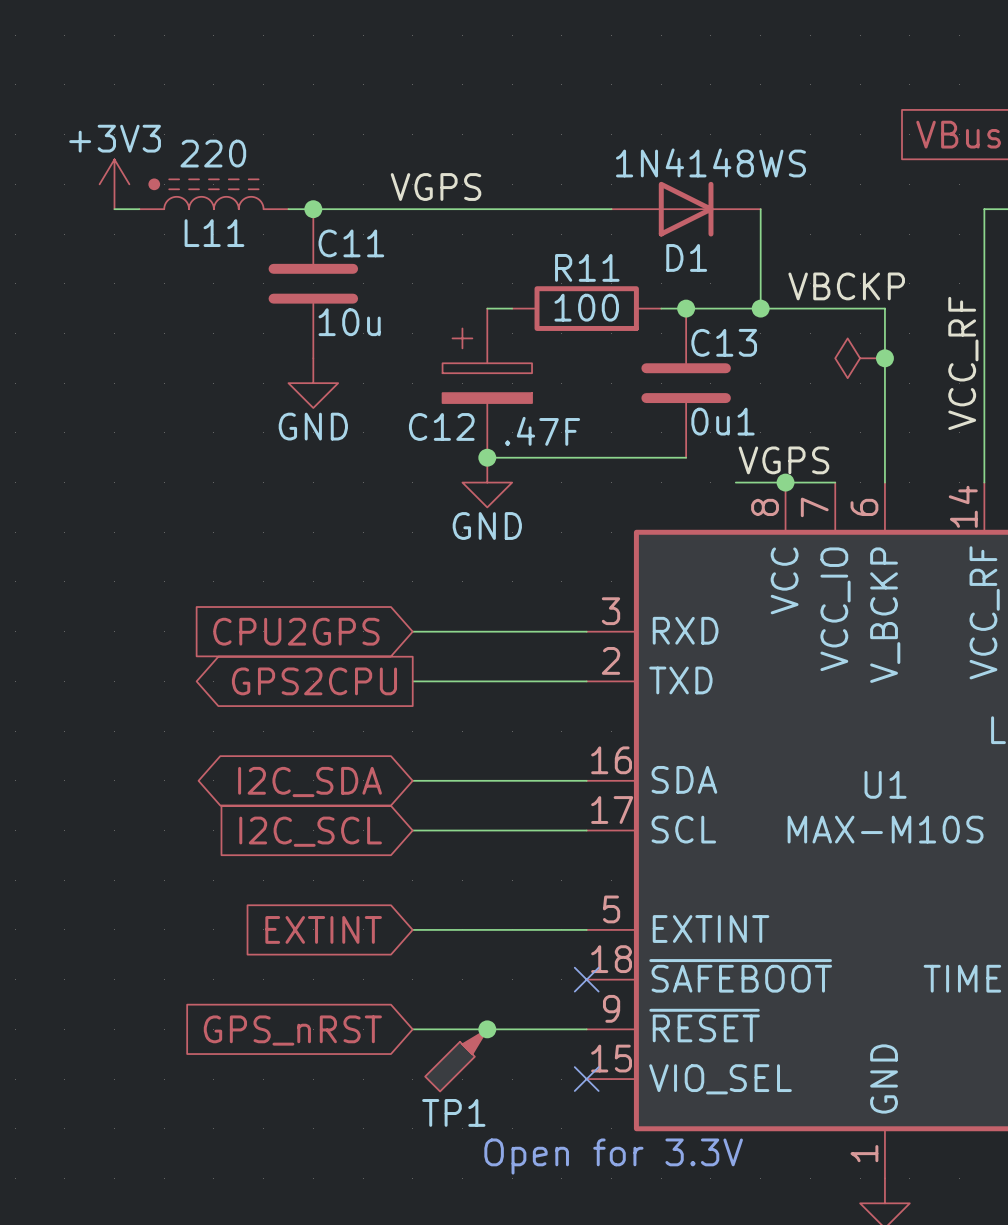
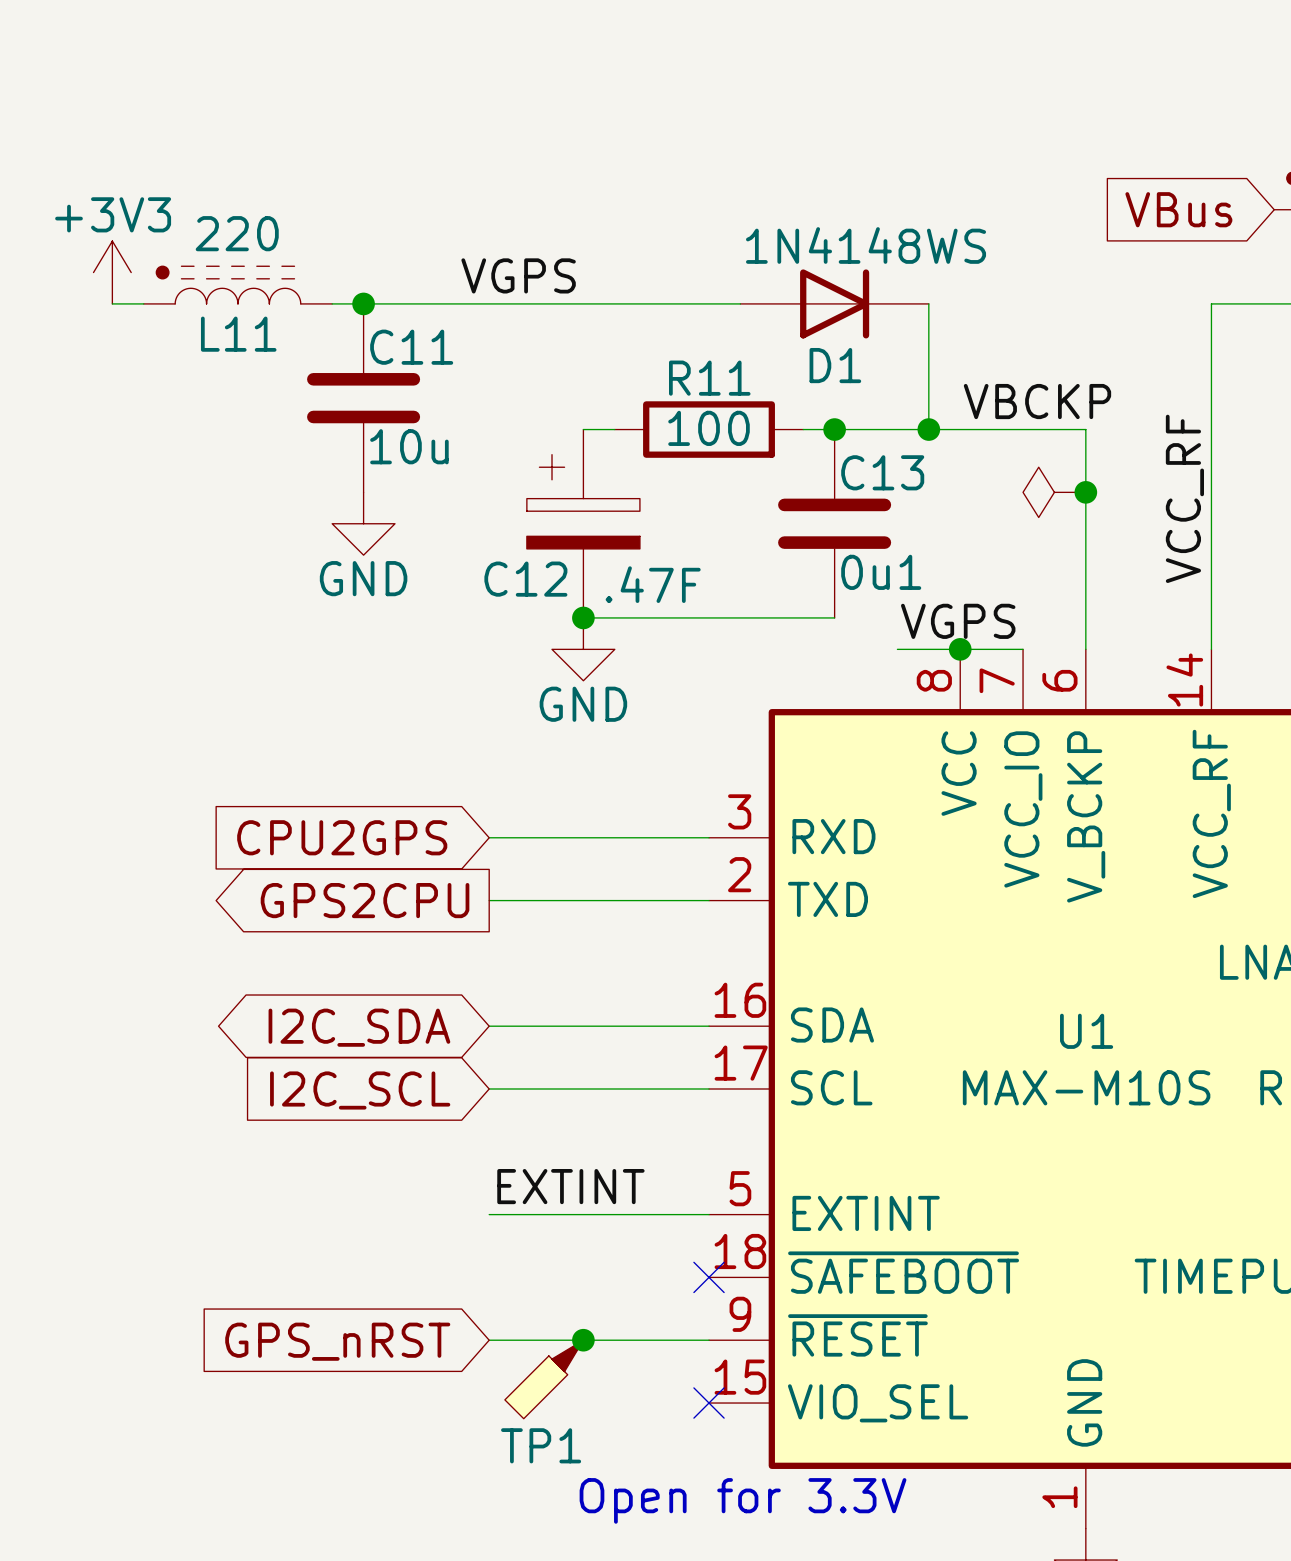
label: none -> EXTINT (570, 1186)
global label: EXTINT (323, 929) -> none

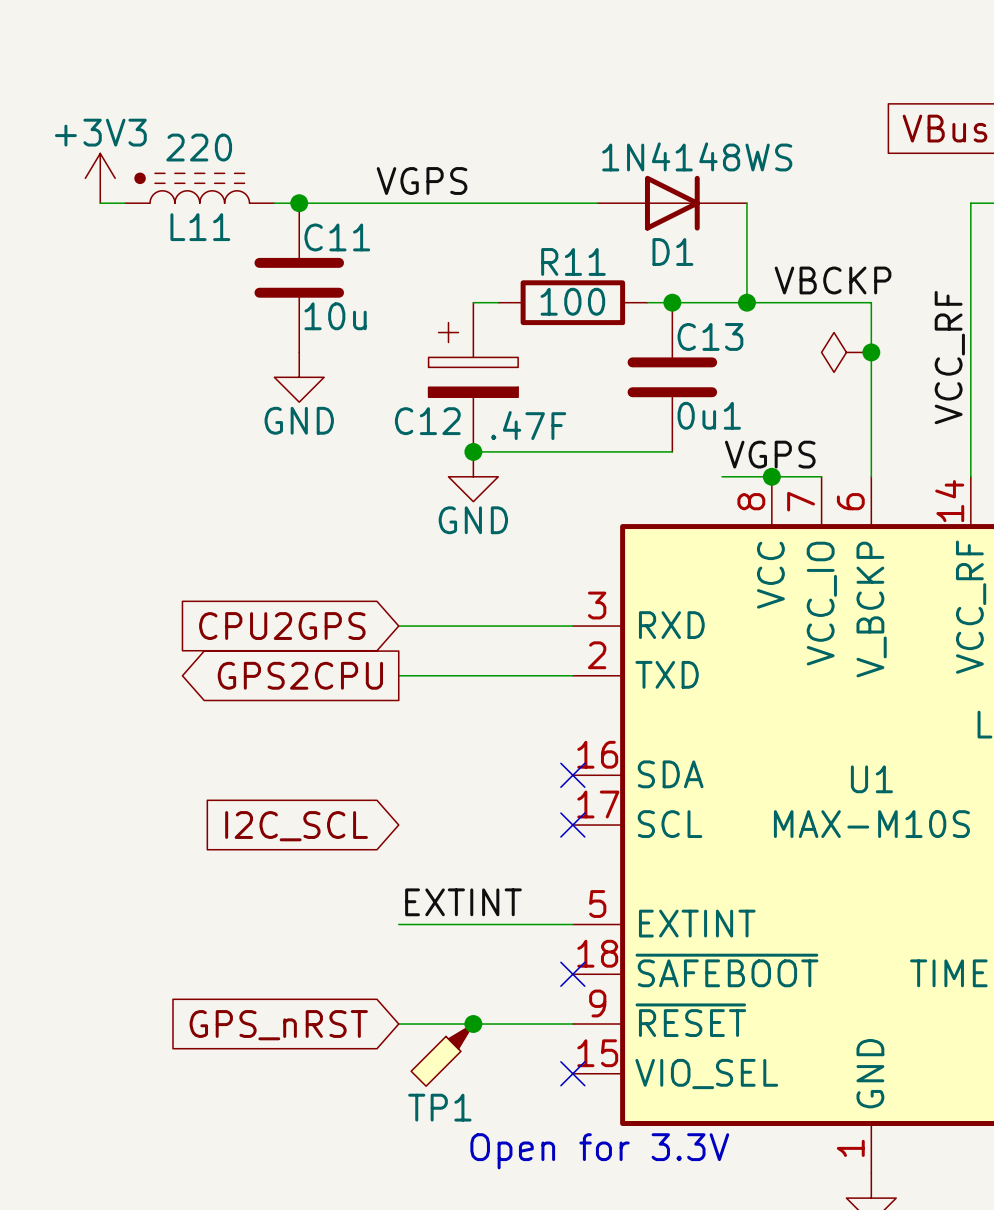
wire: (489, 1026) (709, 1026) -> none
no-connect mark: none -> (572, 775)
global label: I2C_SDA (359, 1027) -> none
wire: (489, 1088) (709, 1088) -> none
no-connect mark: none -> (572, 825)

